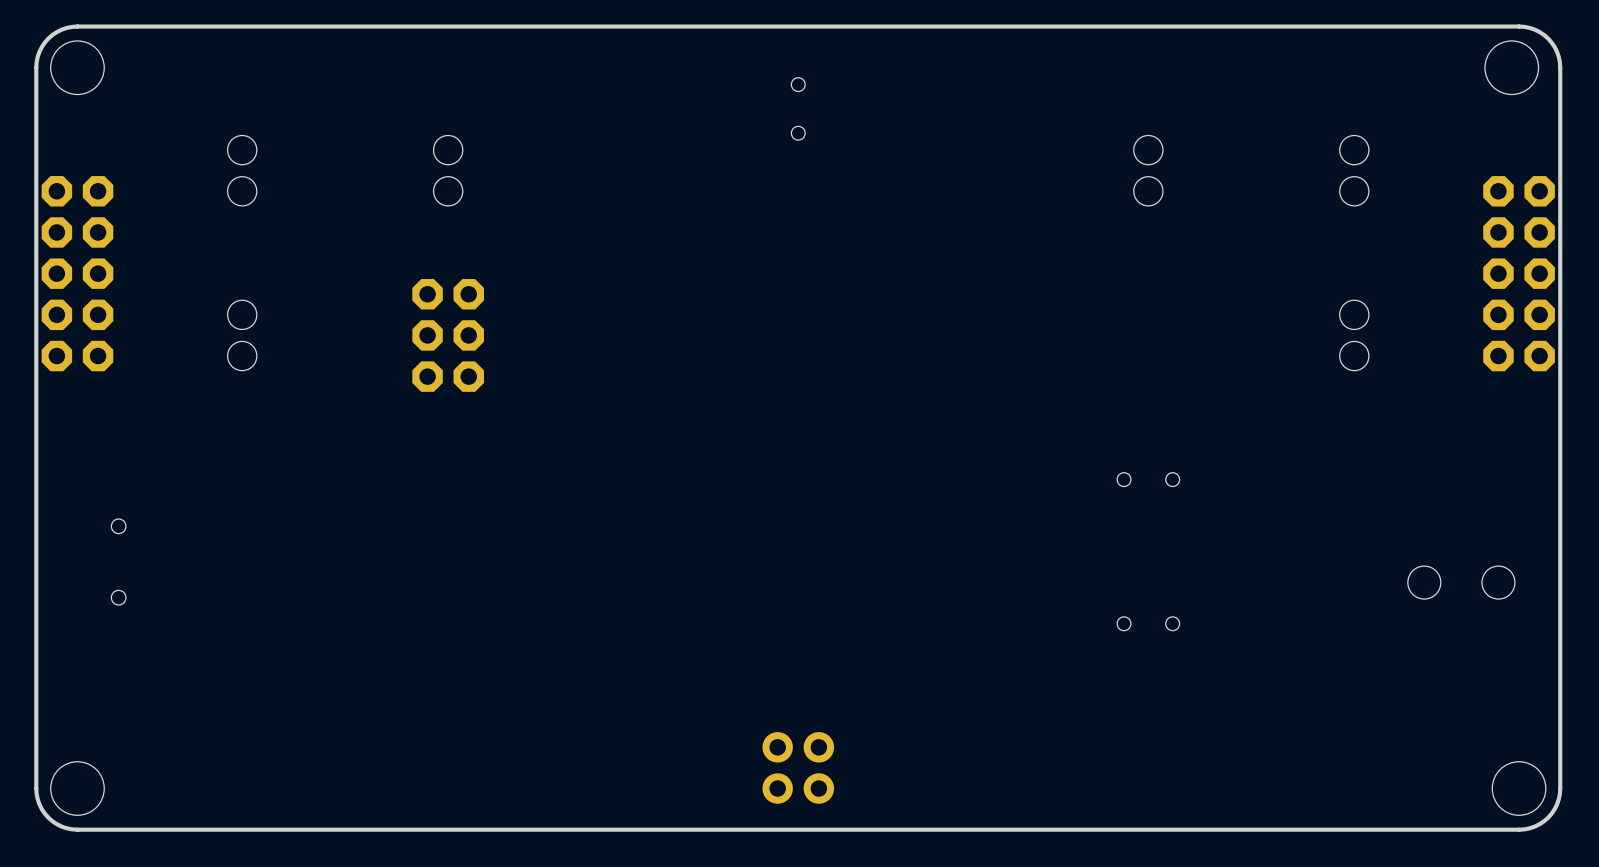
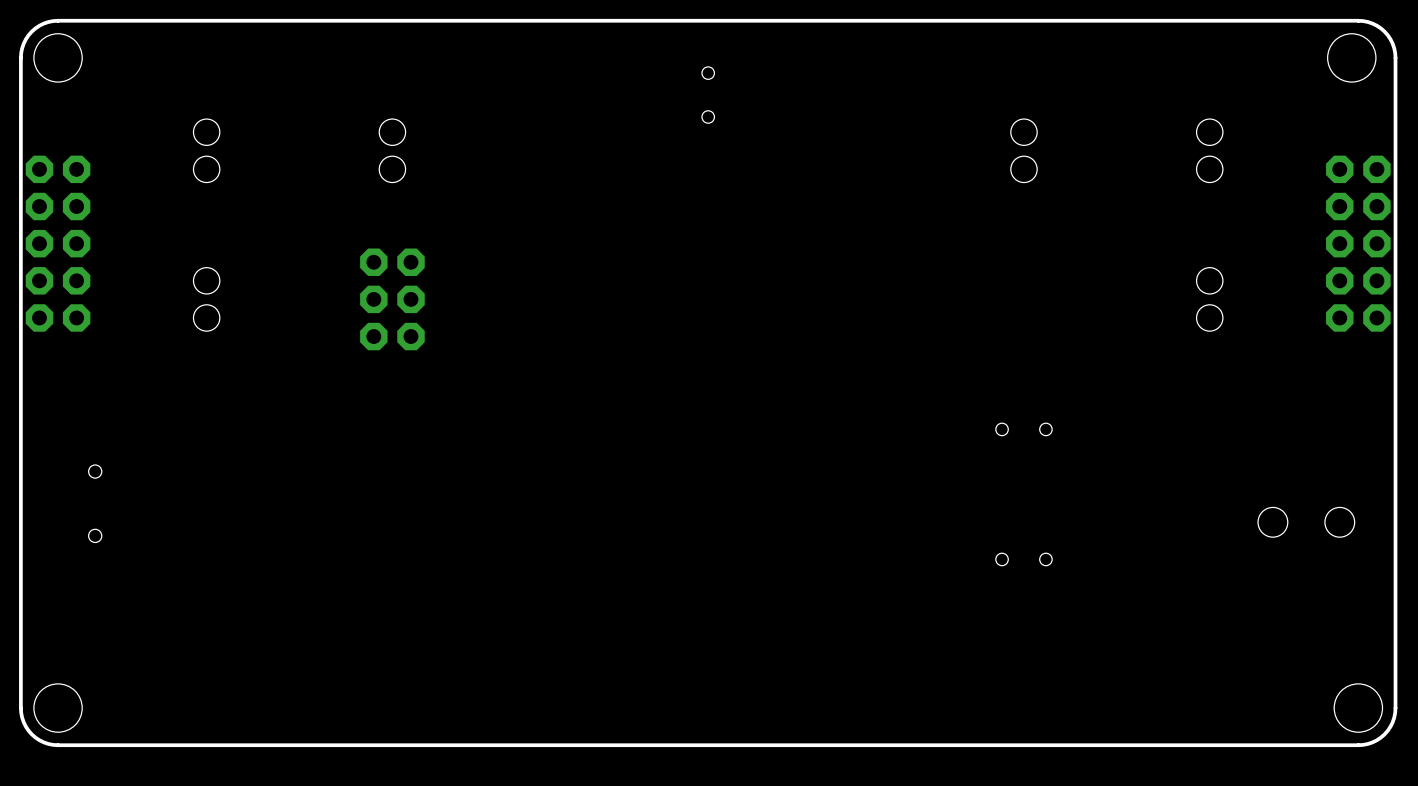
part: (777, 767) -> none
part: (818, 767) -> none

